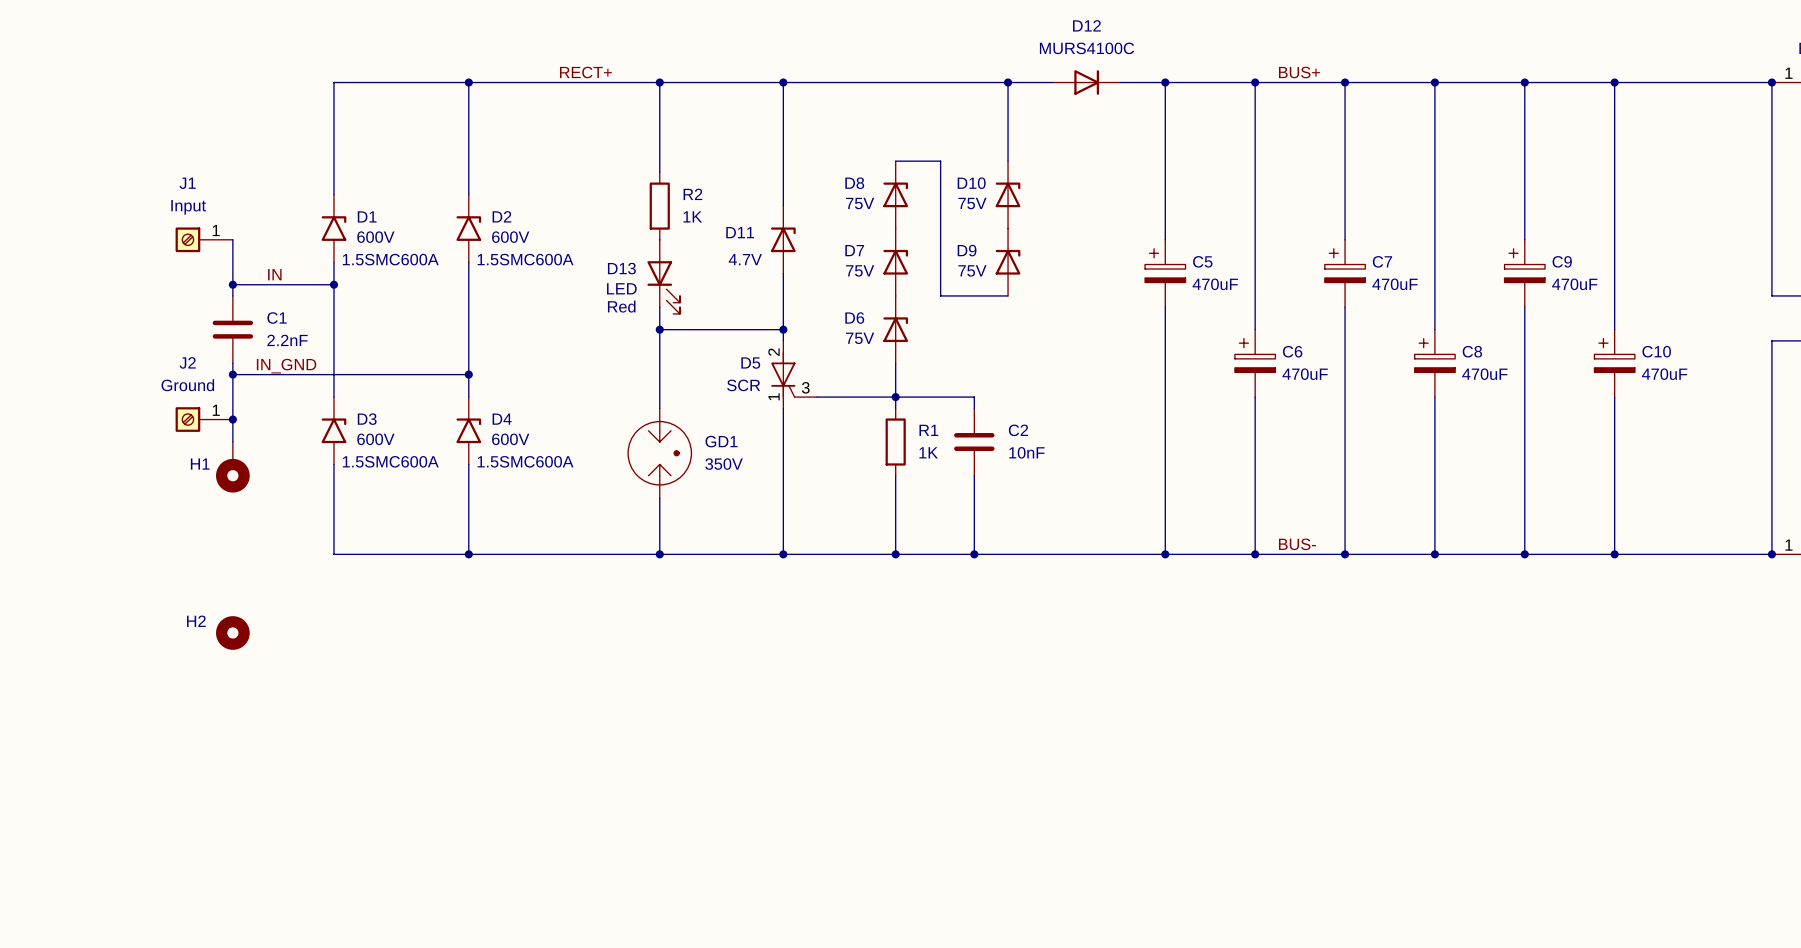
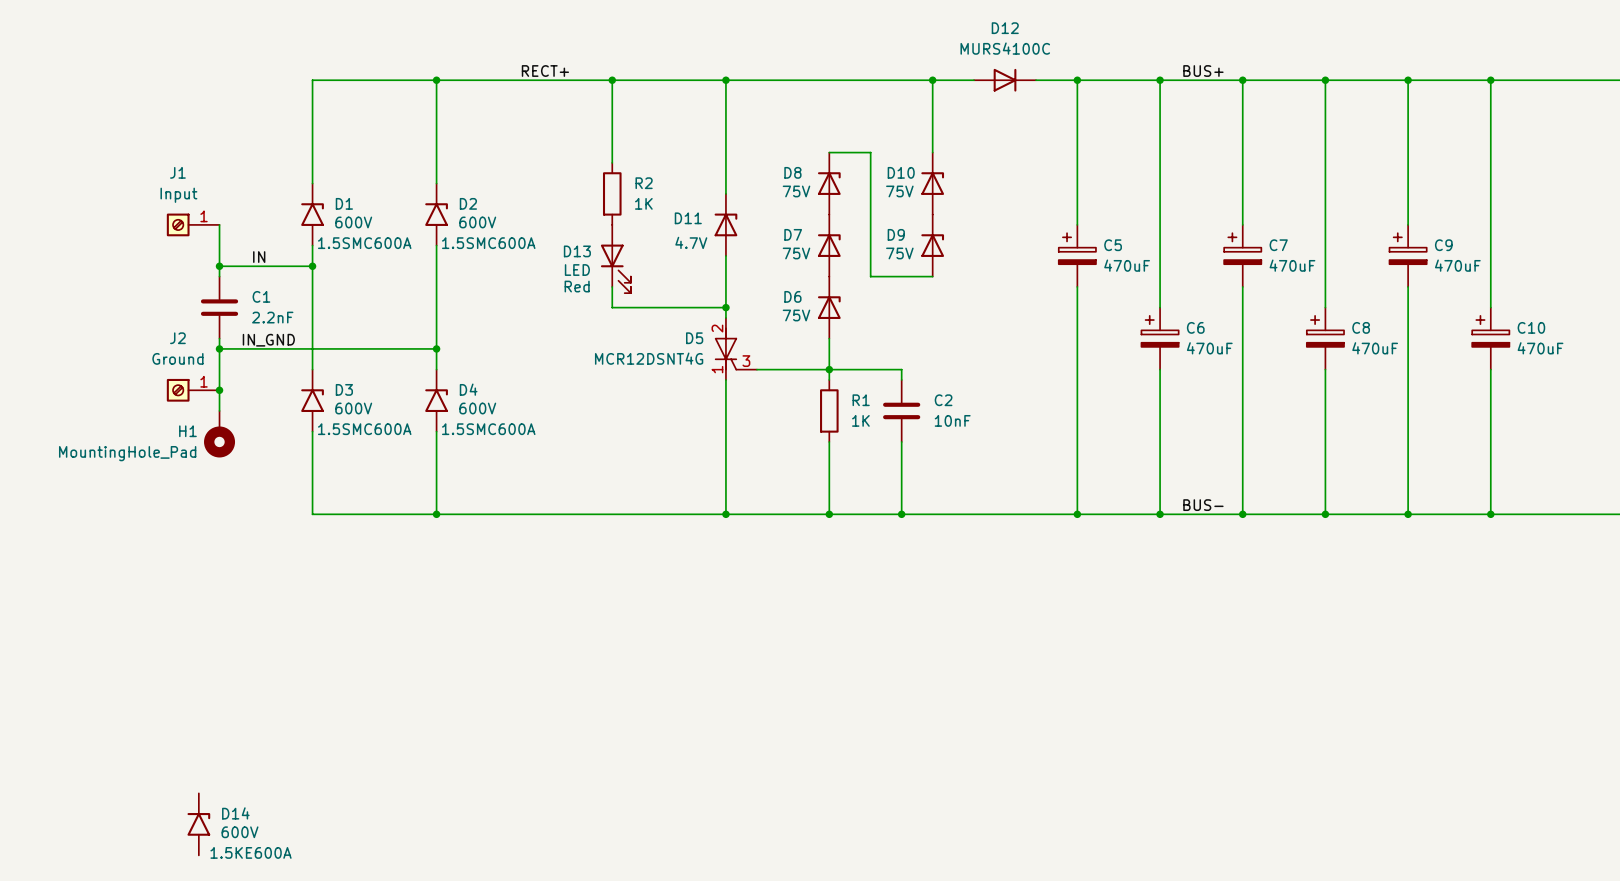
wire: (659, 329) (659, 408) -> none
junction: (659, 329) -> none
D5 value: SCR (743, 385) -> MCR12DSNT4G (649, 358)
GD1: 350V (659, 453) -> none
H1 value: none -> MountingHole_Pad (127, 453)
wire: (659, 498) (659, 554) -> none
junction: (659, 554) -> none
H2: (232, 632) -> none
D14: none -> 600V (198, 824)

